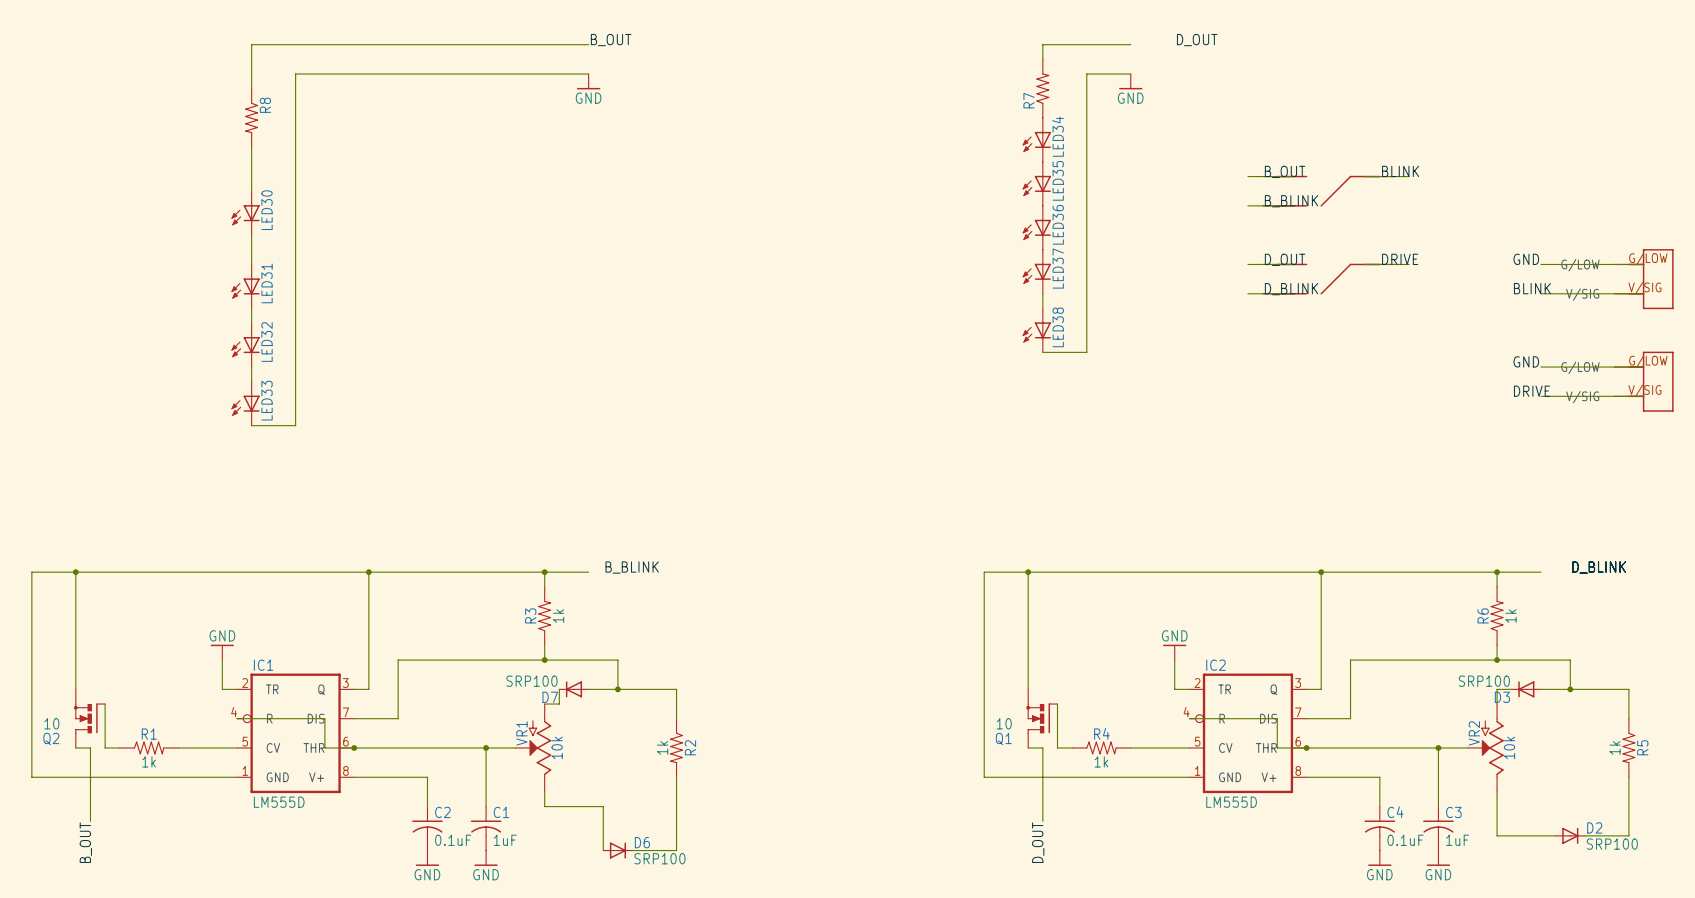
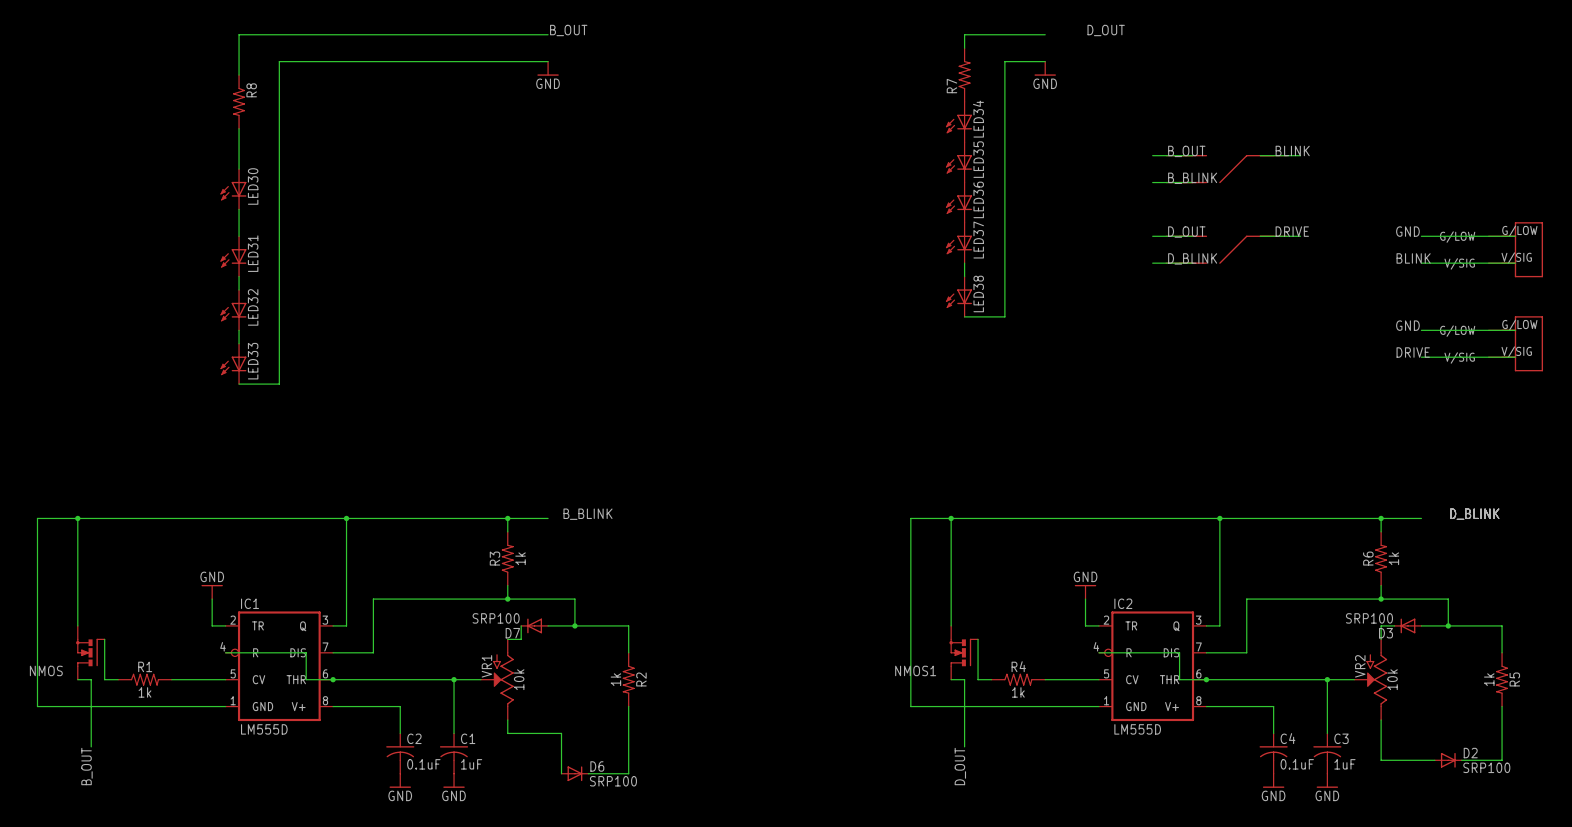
Q2 value: 10 (51, 723) -> none
Q1 value: 10 (1004, 723) -> none
Q2 name: Q2 (51, 738) -> NMOS (46, 670)
Q1 name: Q1 (1003, 738) -> NMOS1 (915, 670)

